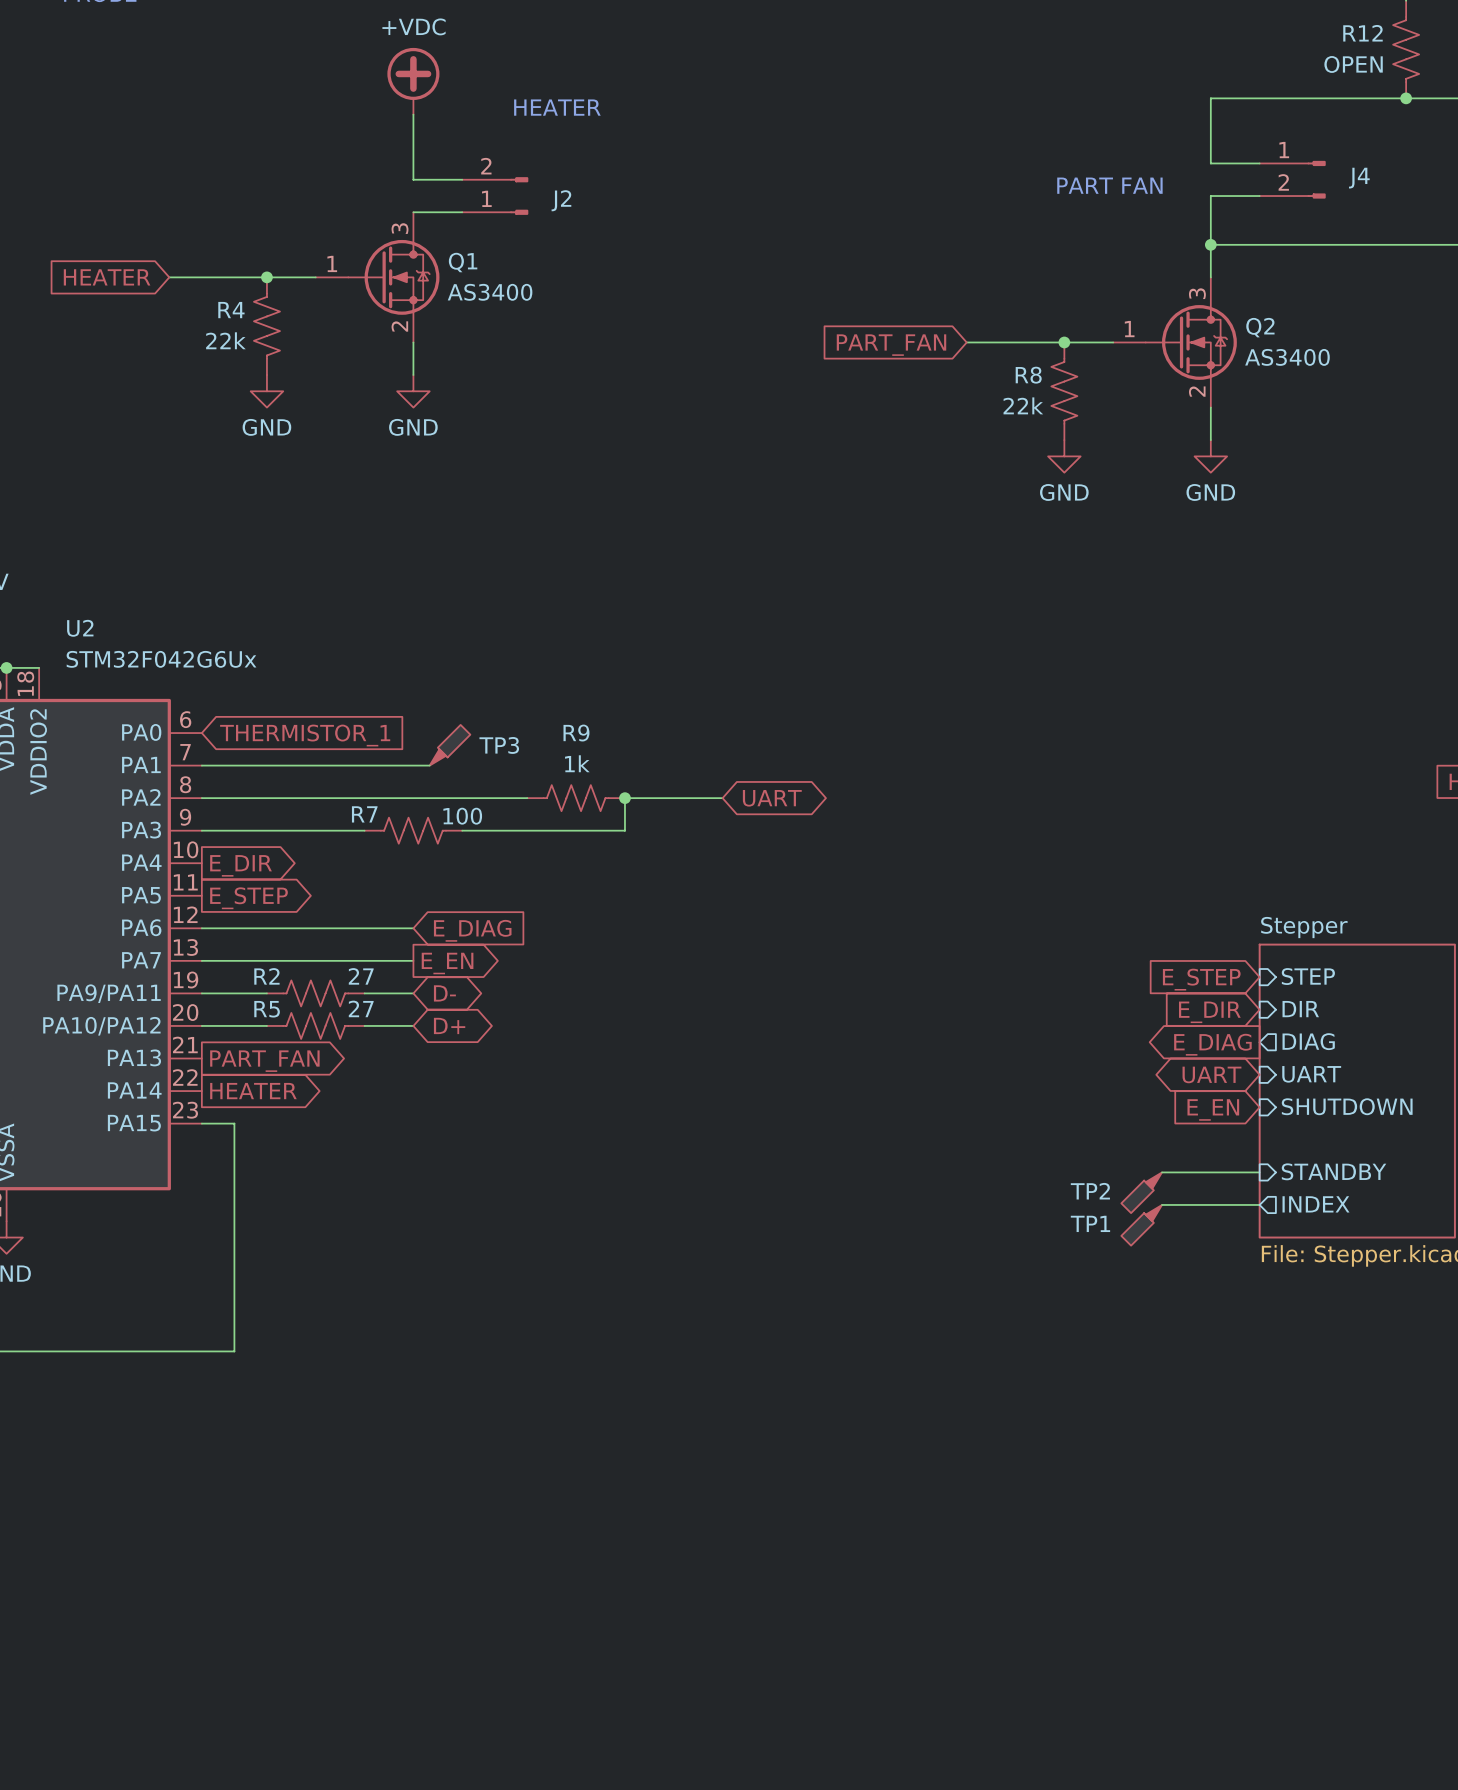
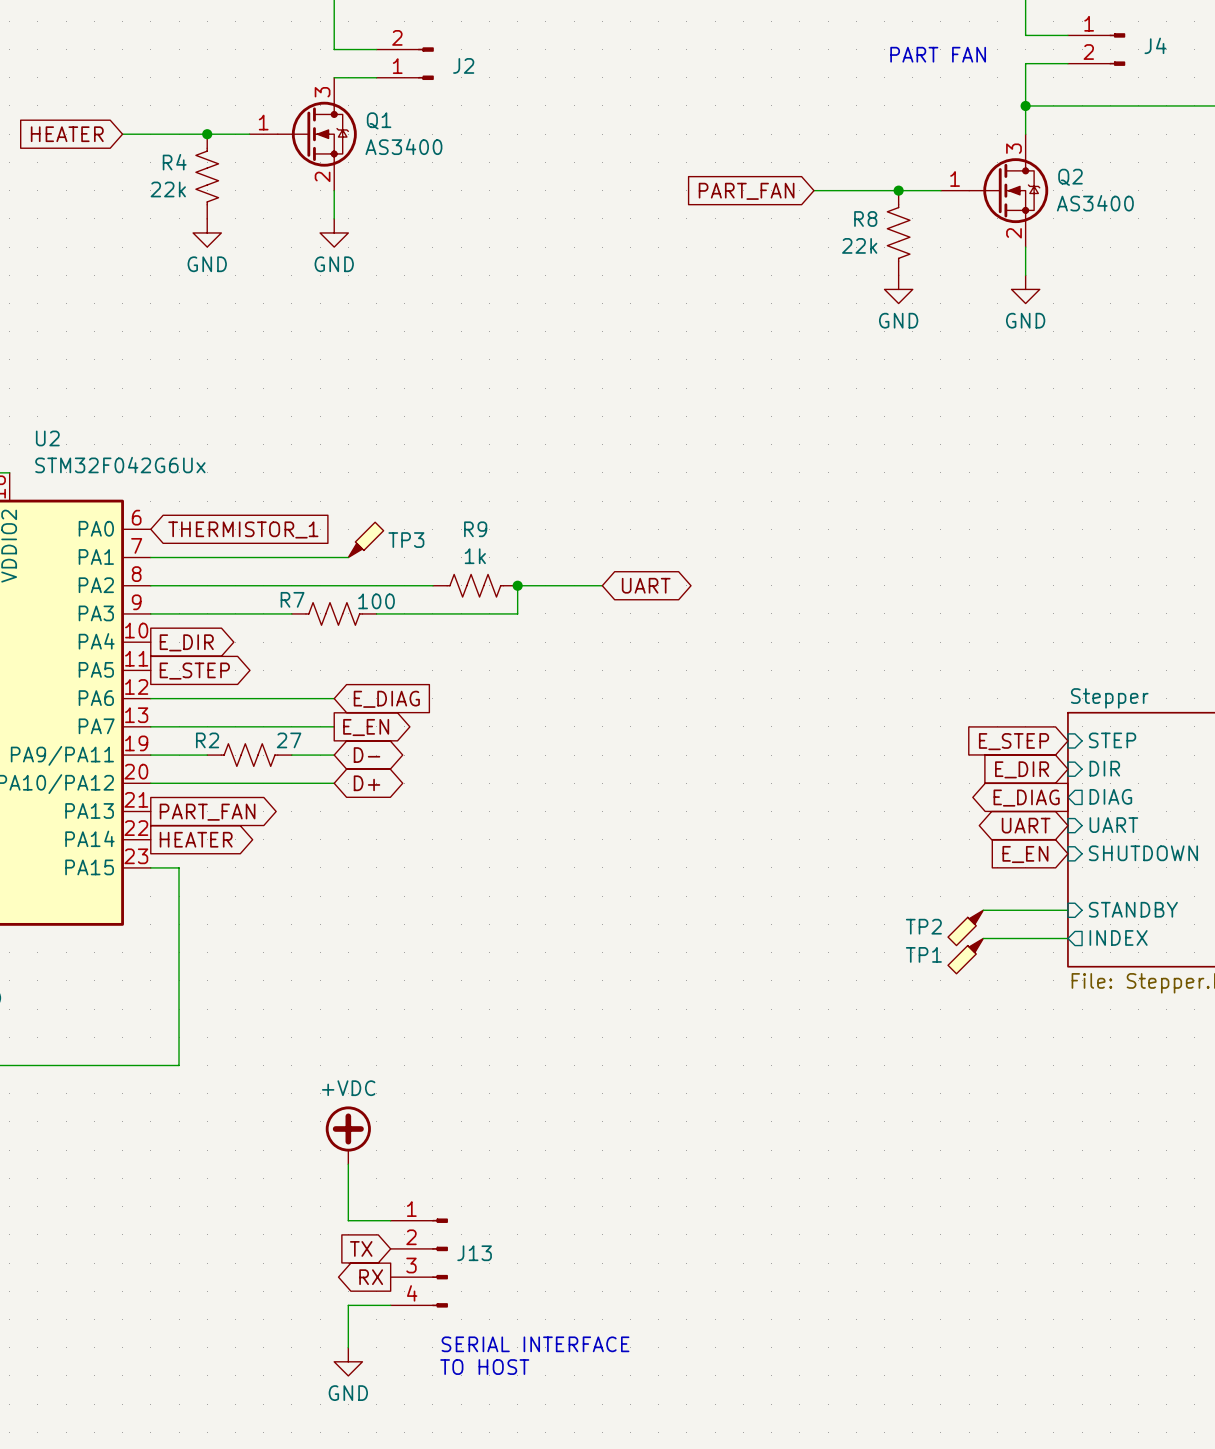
R5: 27 (315, 1025) -> none
power symbol: none -> +VDC (348, 1135)
wire: none -> (348, 1164) (348, 1220) (390, 1220)
global label: none -> TX (361, 1248)
J13: none -> (419, 1263)
global label: none -> RX (371, 1277)
wire: none -> (390, 1305) (348, 1305) (348, 1347)
text: none -> SERIAL INTERFACE (535, 1344)
power symbol: none -> GND (348, 1361)
text: none -> TO HOST (484, 1367)

